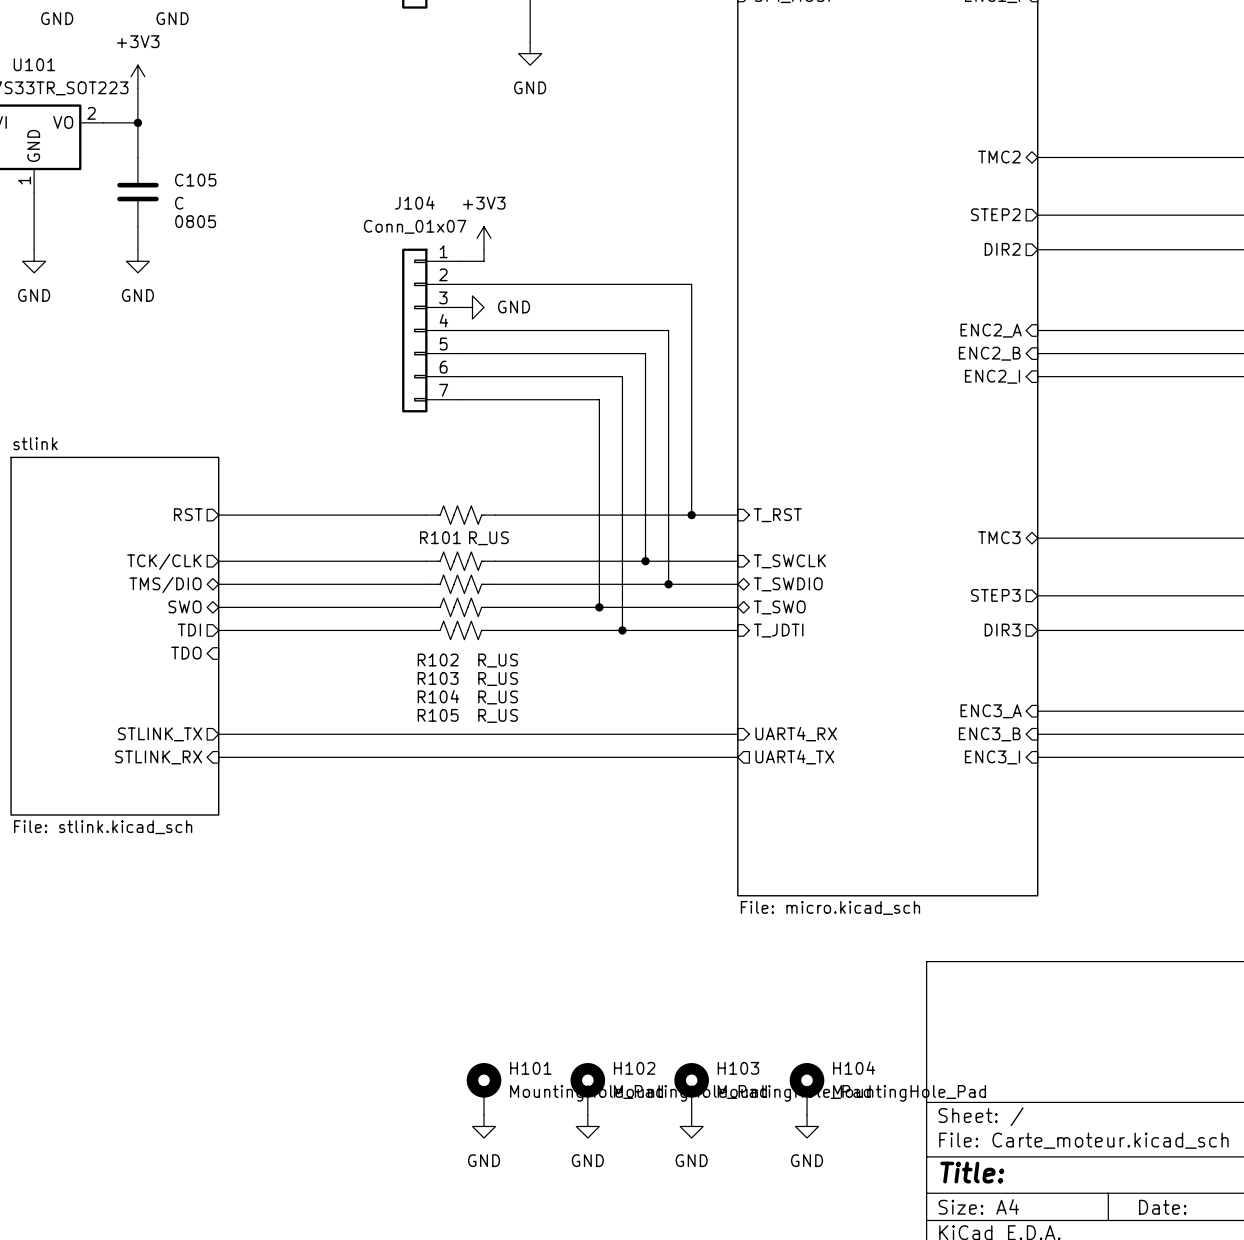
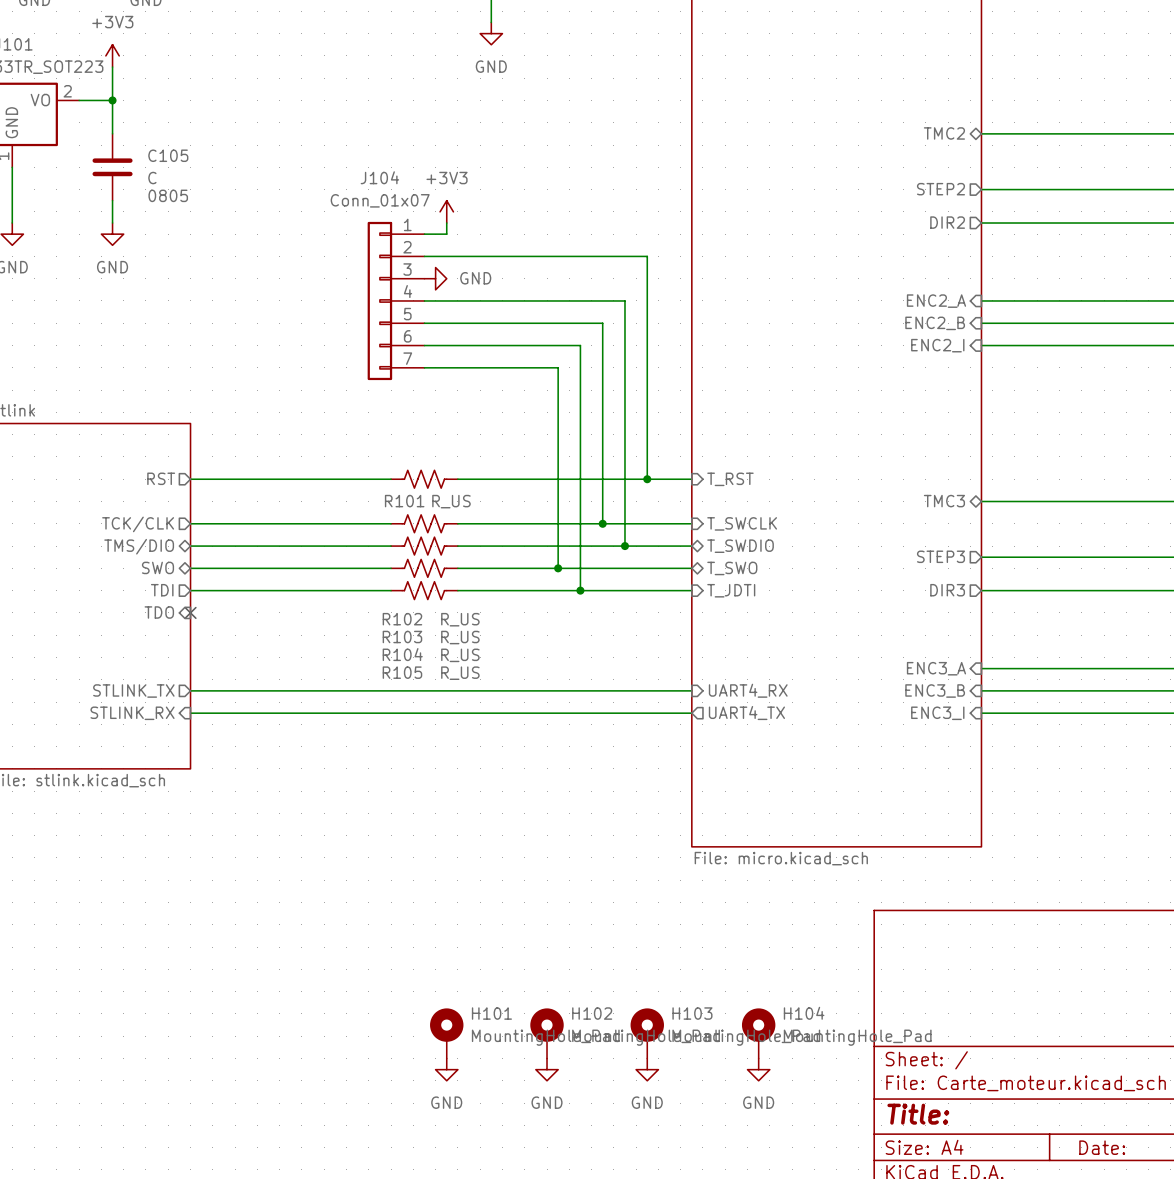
no-connect mark: none -> (190, 612)

